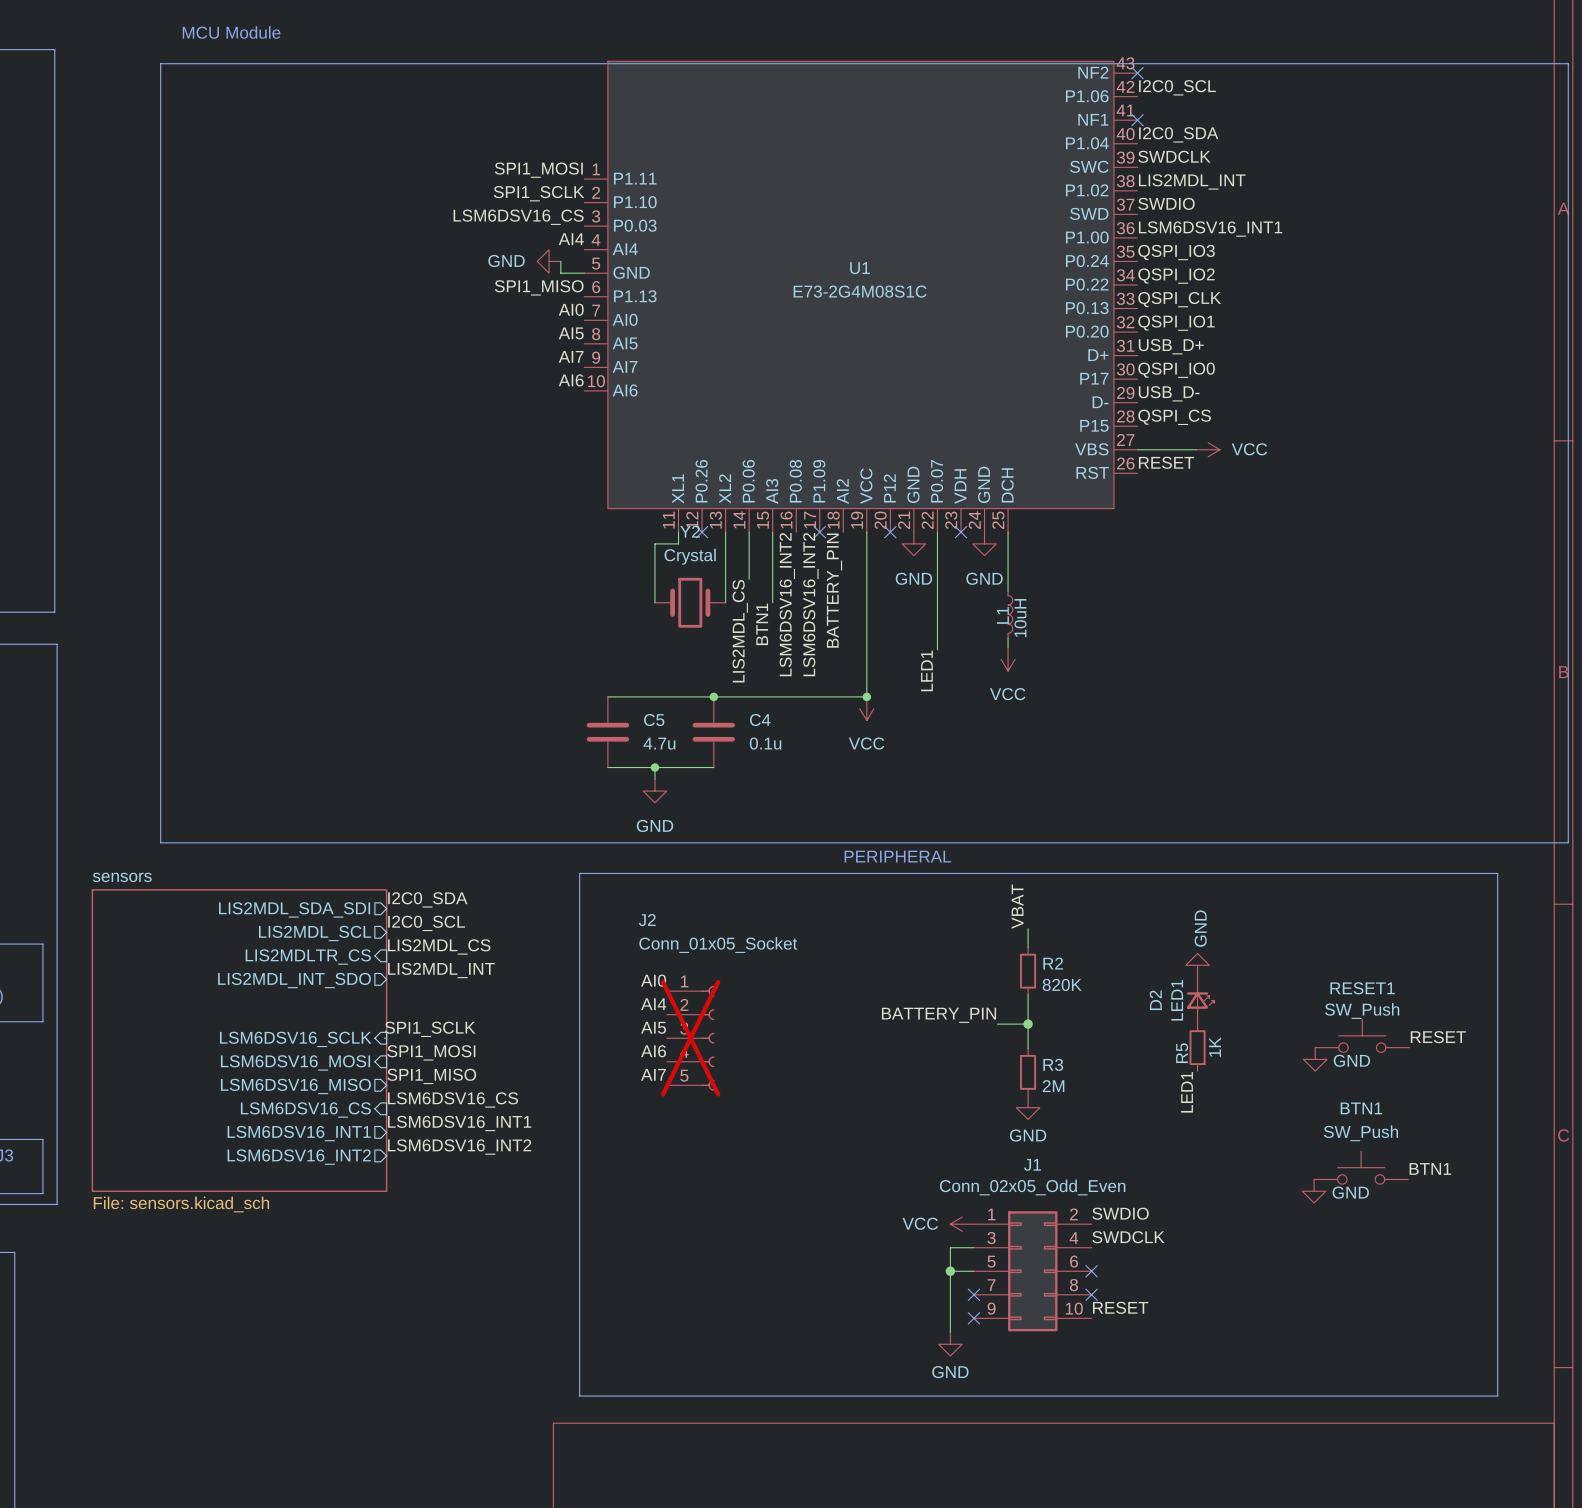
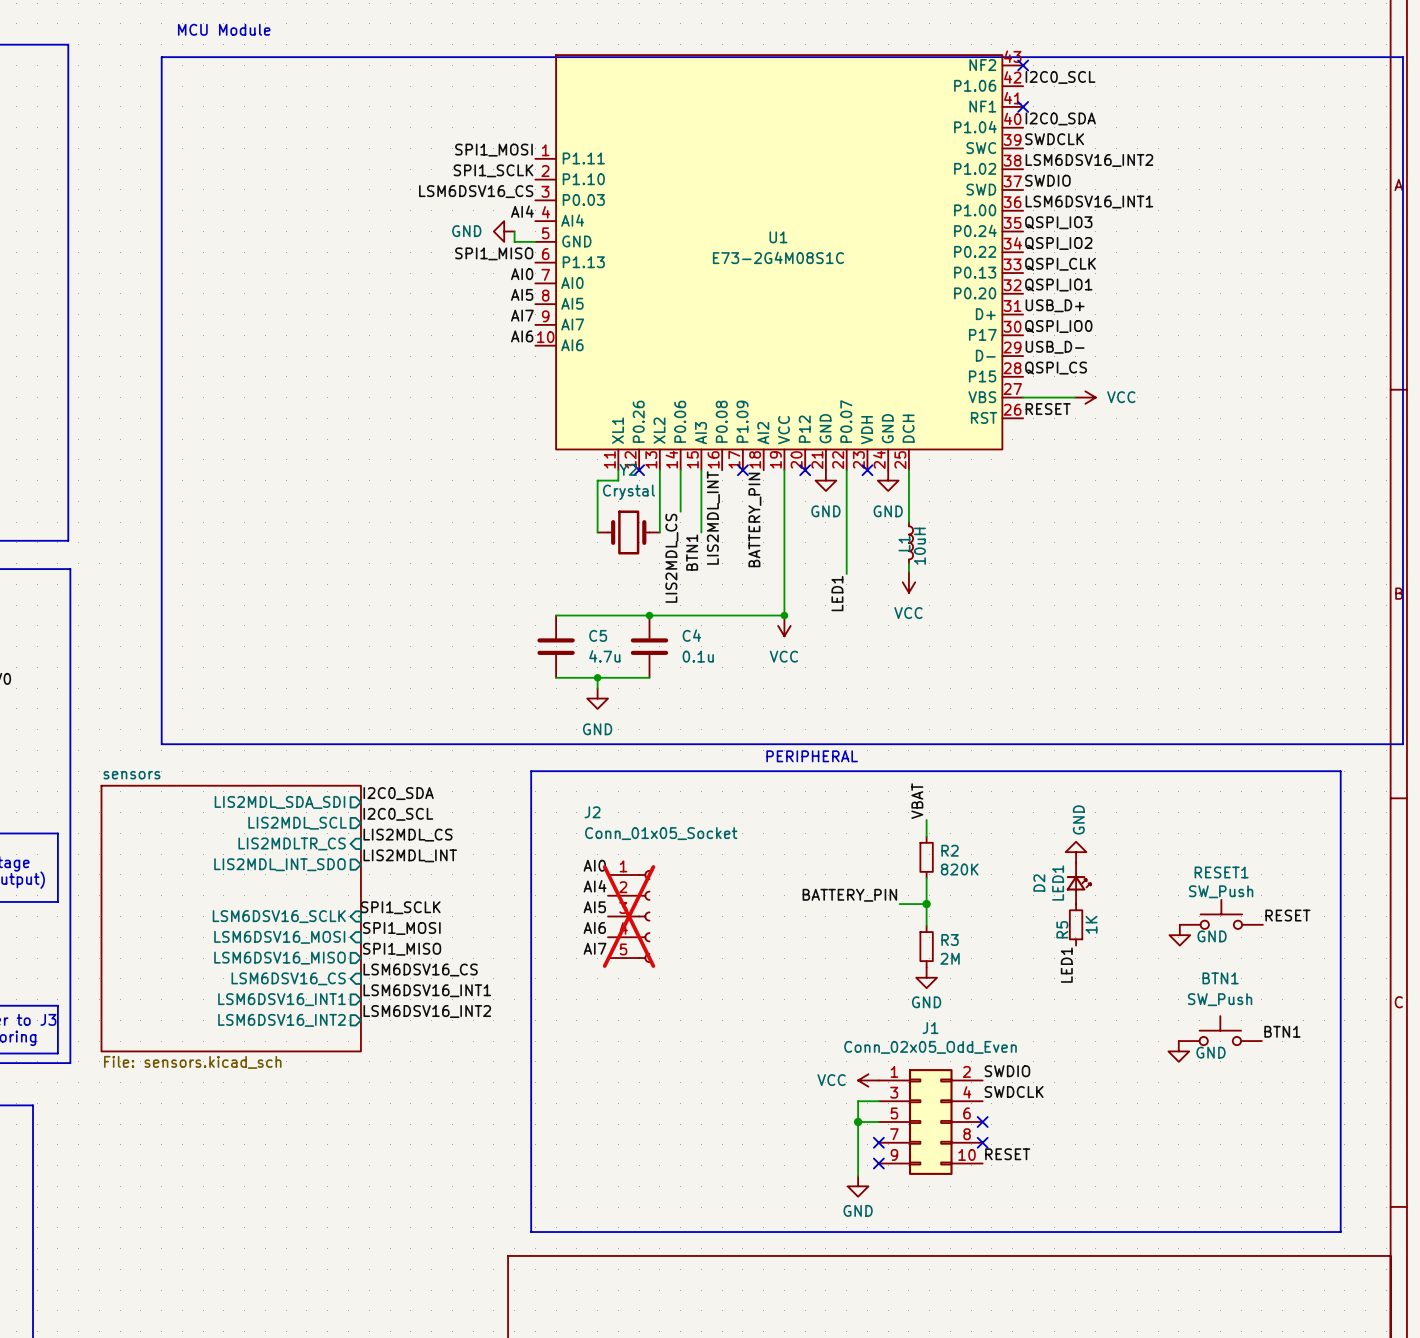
label: LIS2MDL_INT (1192, 181) -> LSM6DSV16_INT2 (1089, 160)
label: LSM6DSV16_INT2 (787, 604) -> LIS2MDL_INT (713, 517)
label: LSM6DSV16_INT2 (810, 604) -> none

